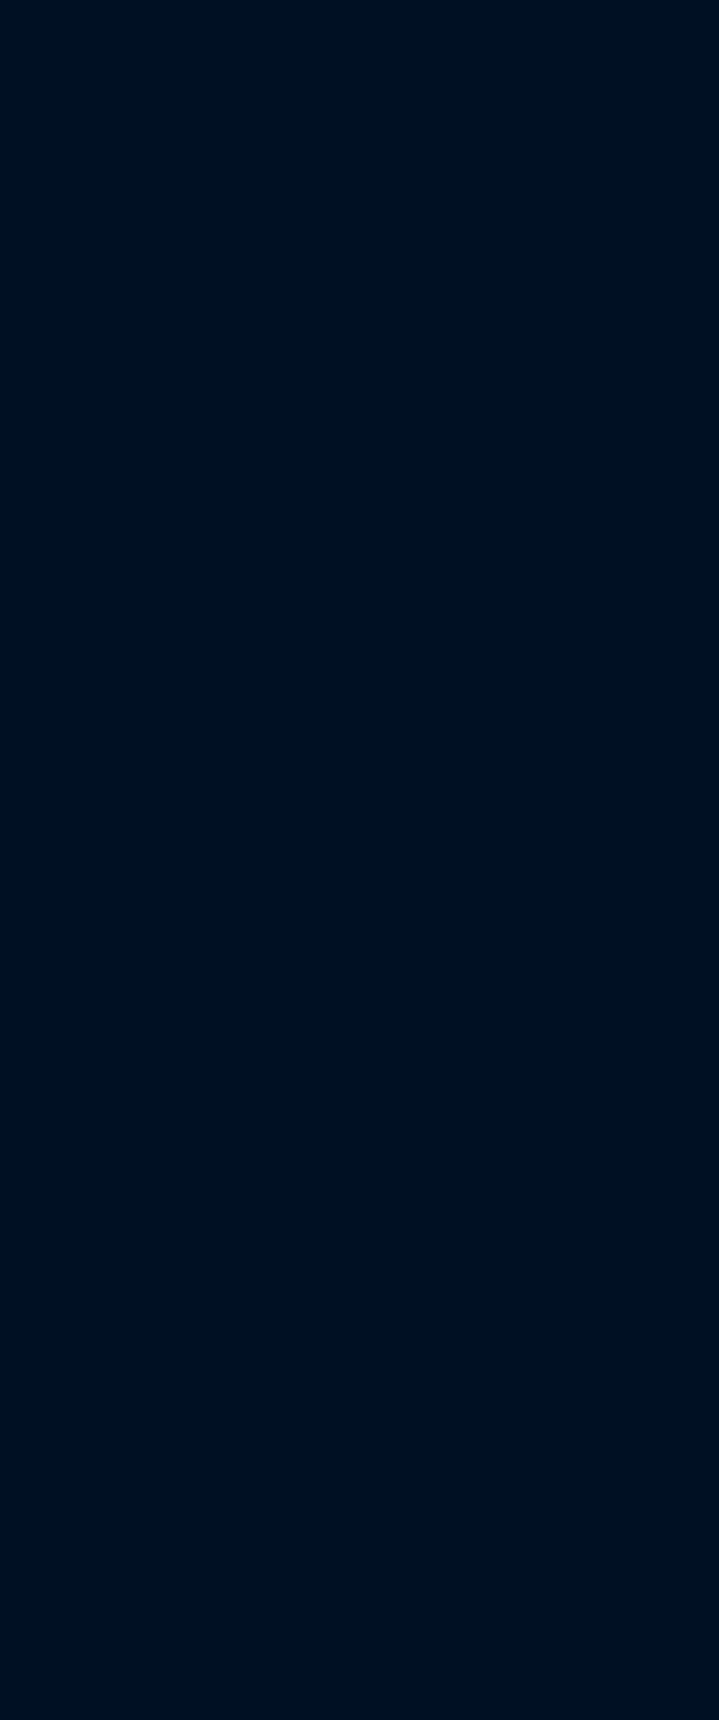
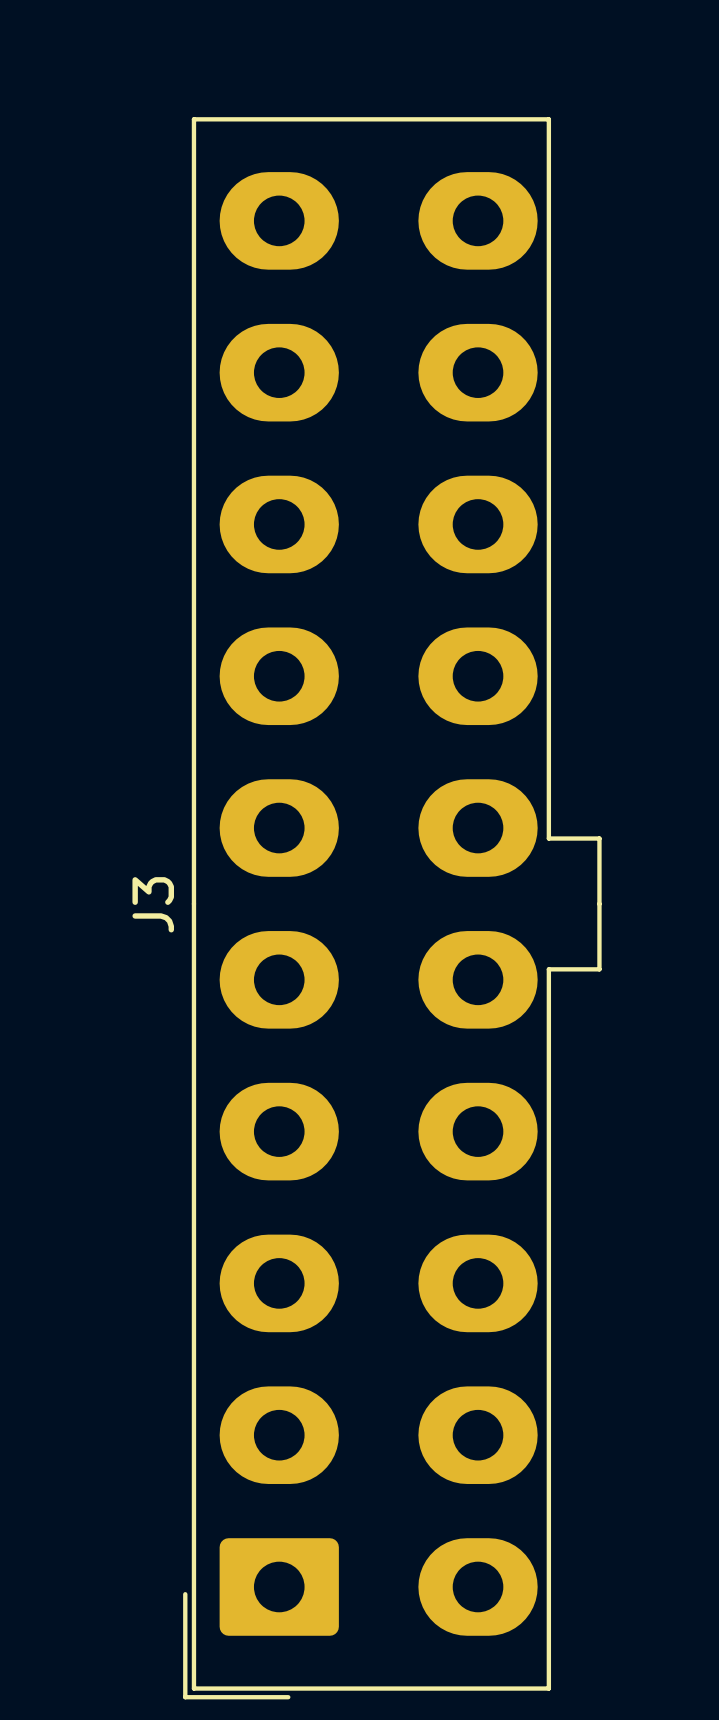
J3: none -> (392, 908)

